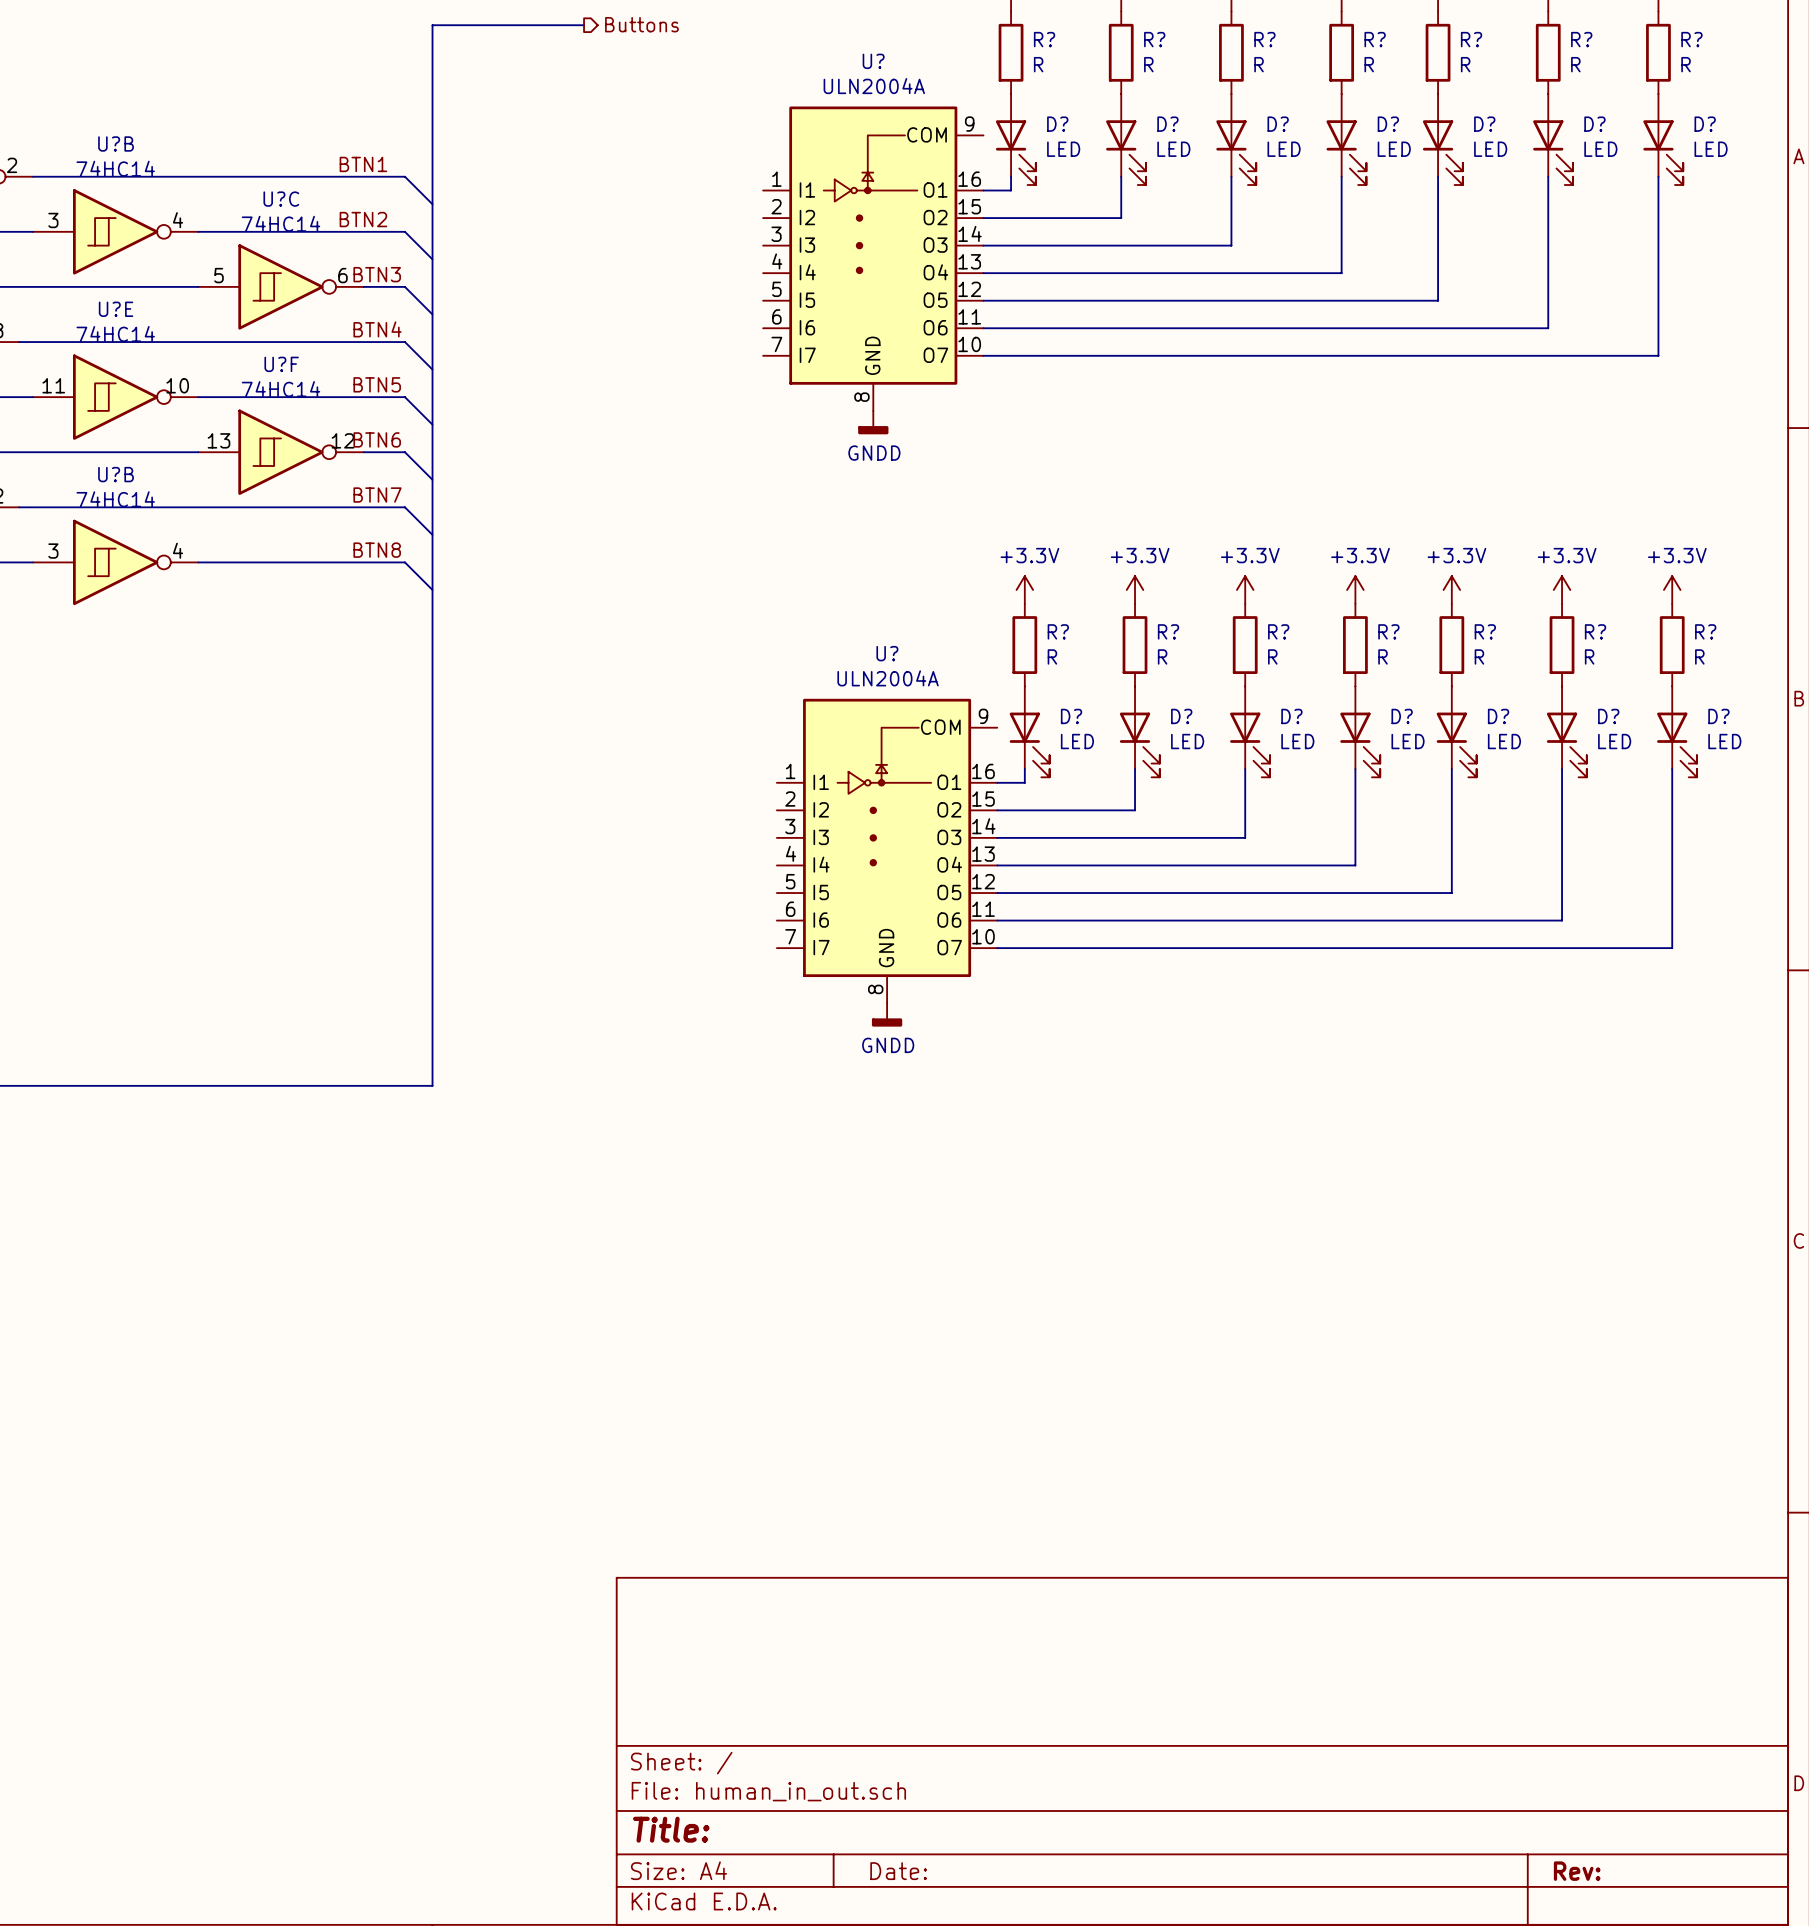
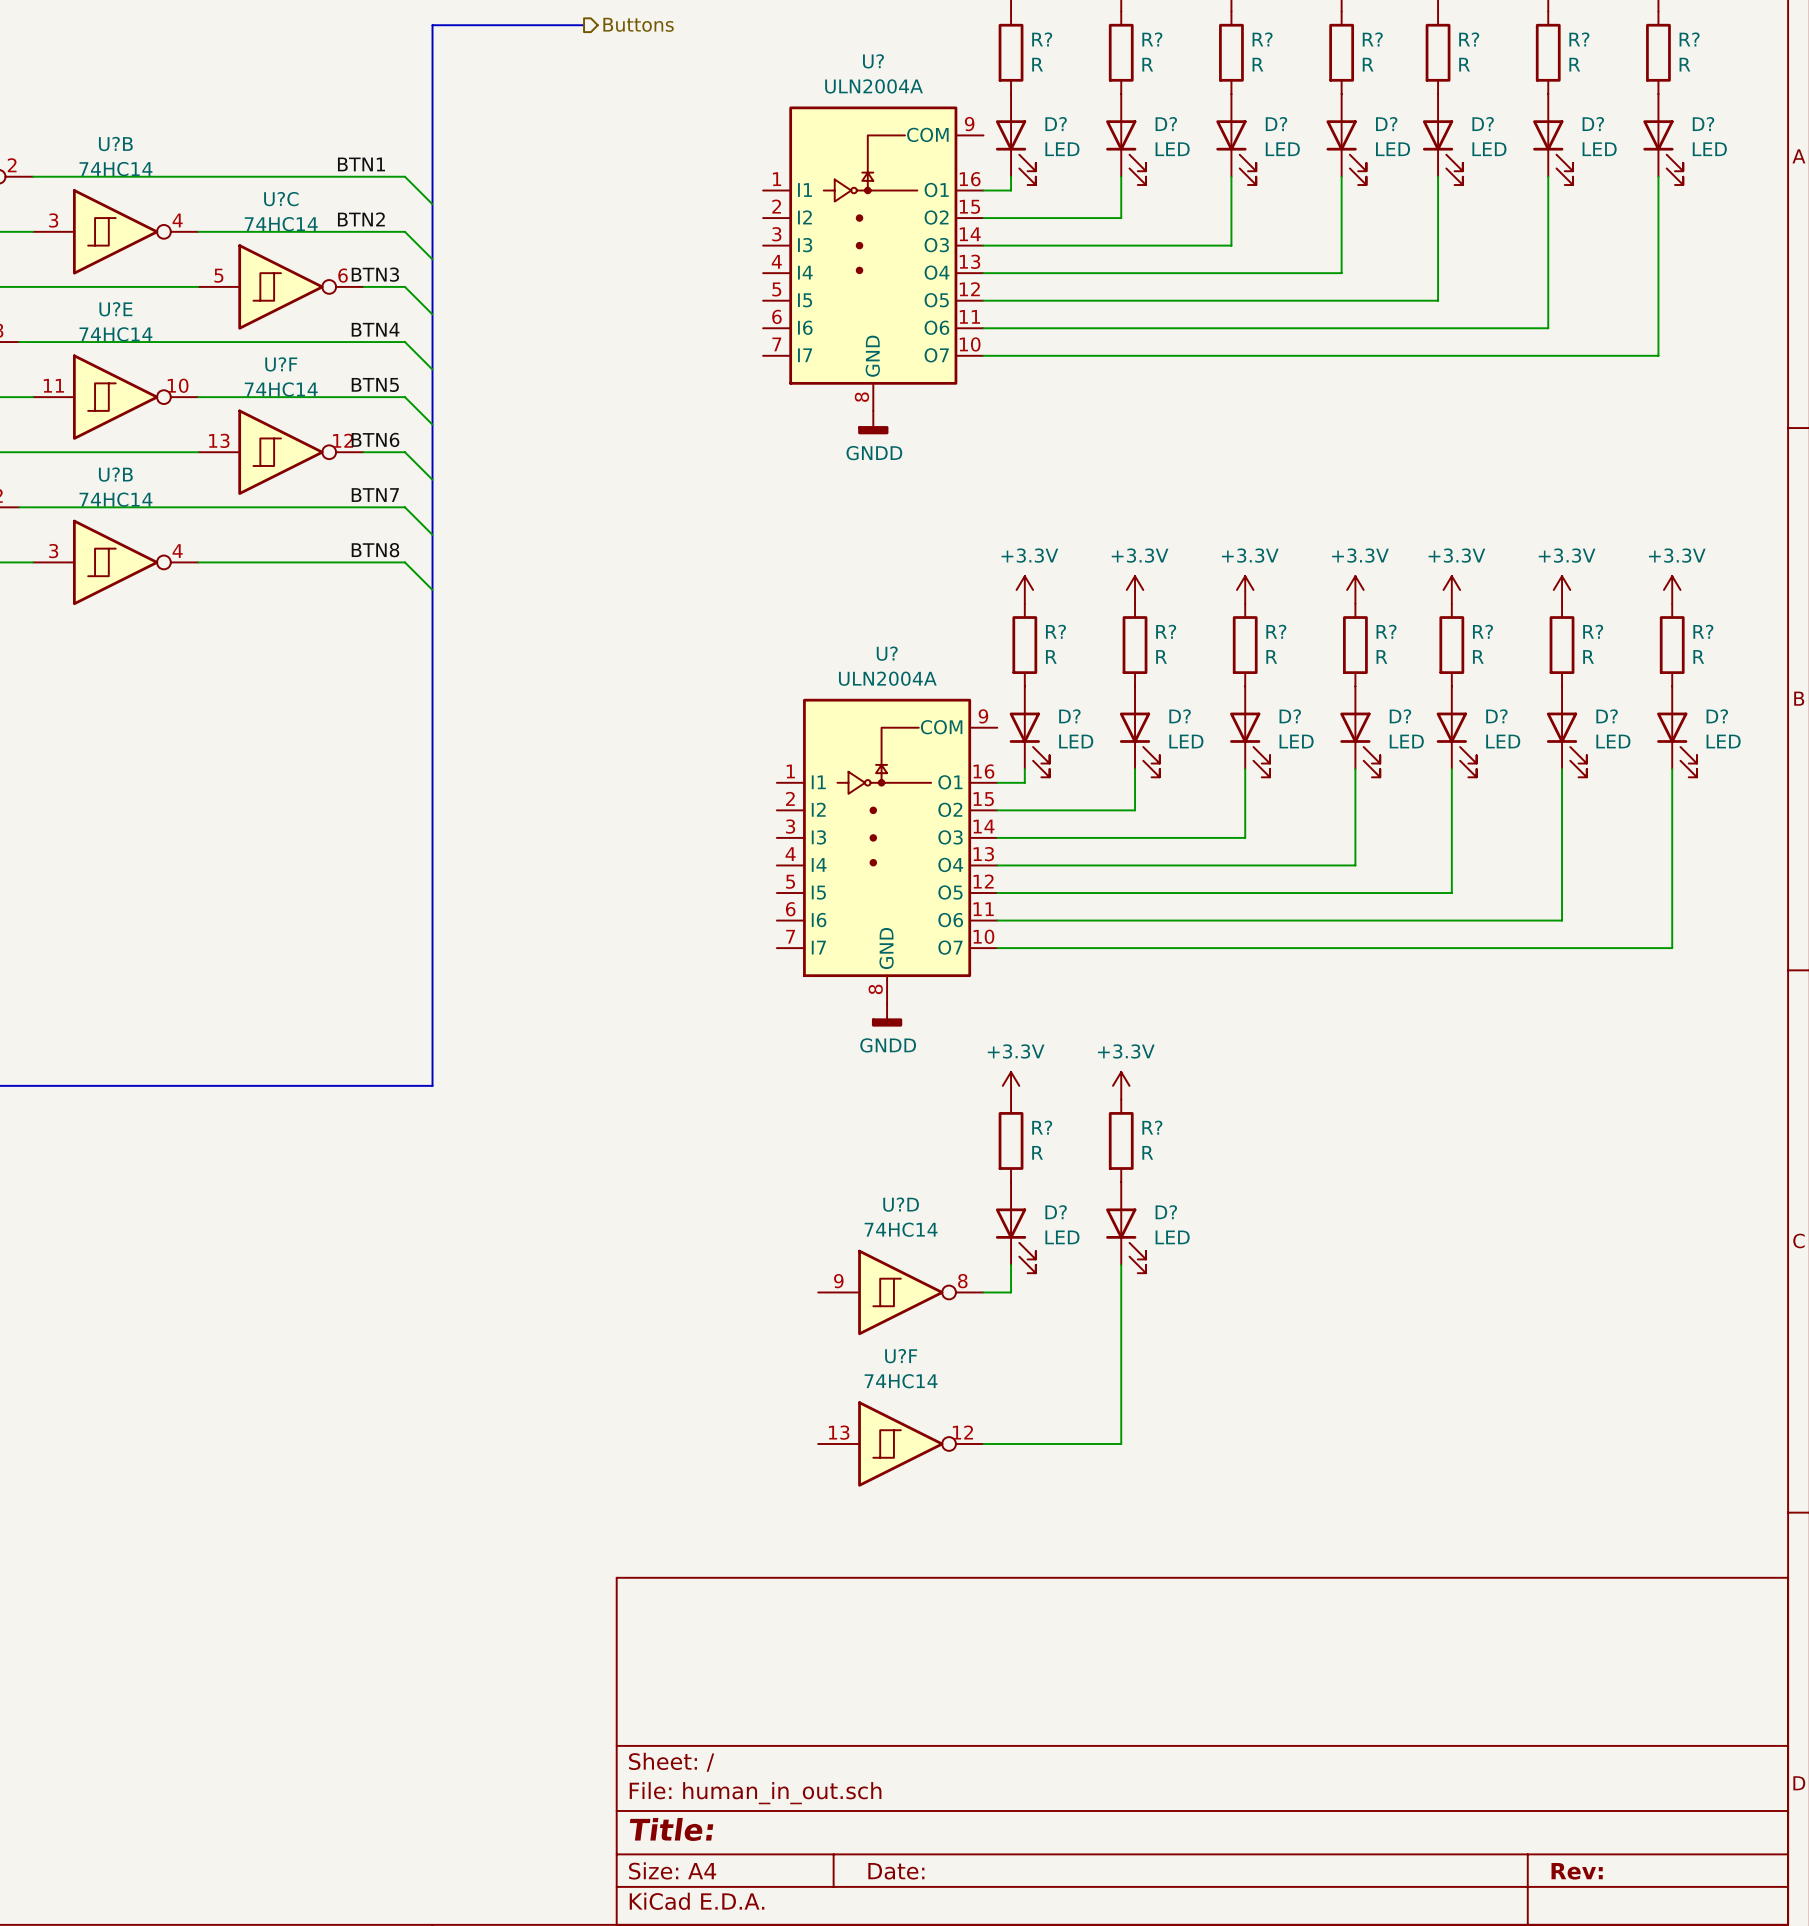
power symbol: none -> +3.3V (1011, 1085)
power symbol: none -> +3.3V (1121, 1085)
R?: none -> R (1011, 1140)
R?: none -> R (1121, 1140)
D?: none -> LED (1015, 1227)
D?: none -> LED (1126, 1227)
wire: none -> (1011, 1264) (1011, 1292) (983, 1292)
wire: none -> (1121, 1264) (1121, 1443) (983, 1443)
U?D: none -> 74HC14 (900, 1292)
U?F: none -> 74HC14 (900, 1443)

